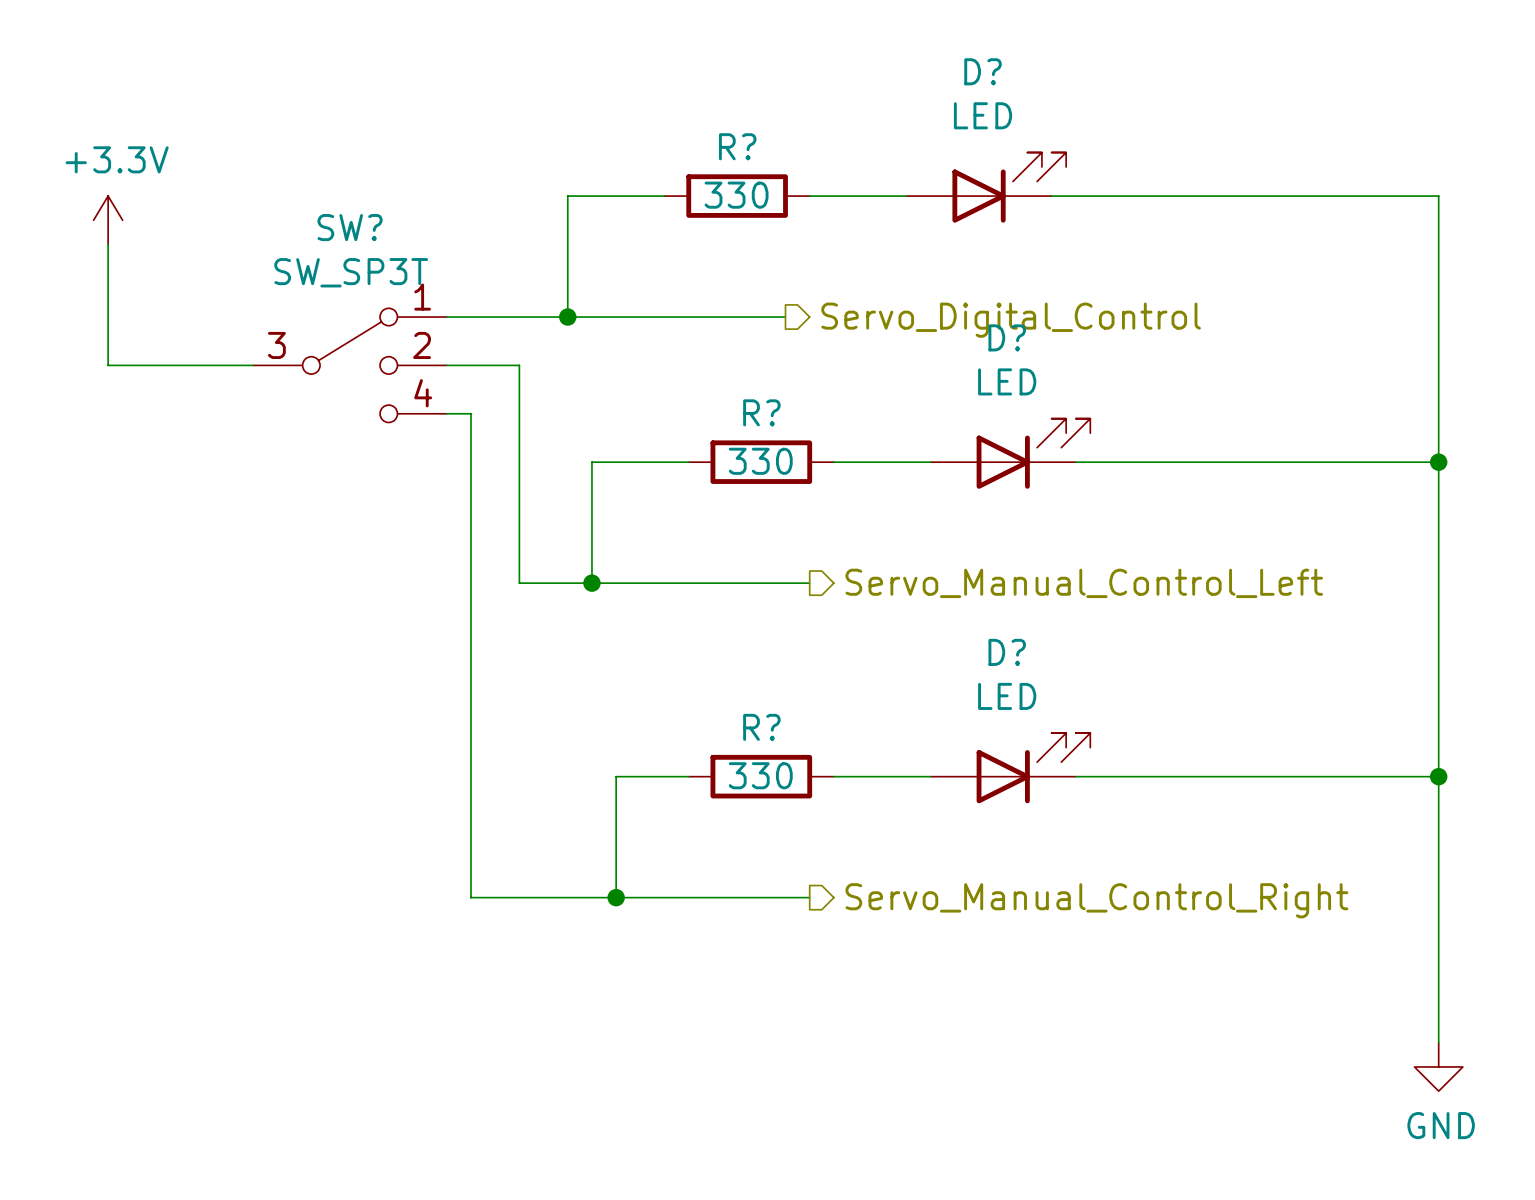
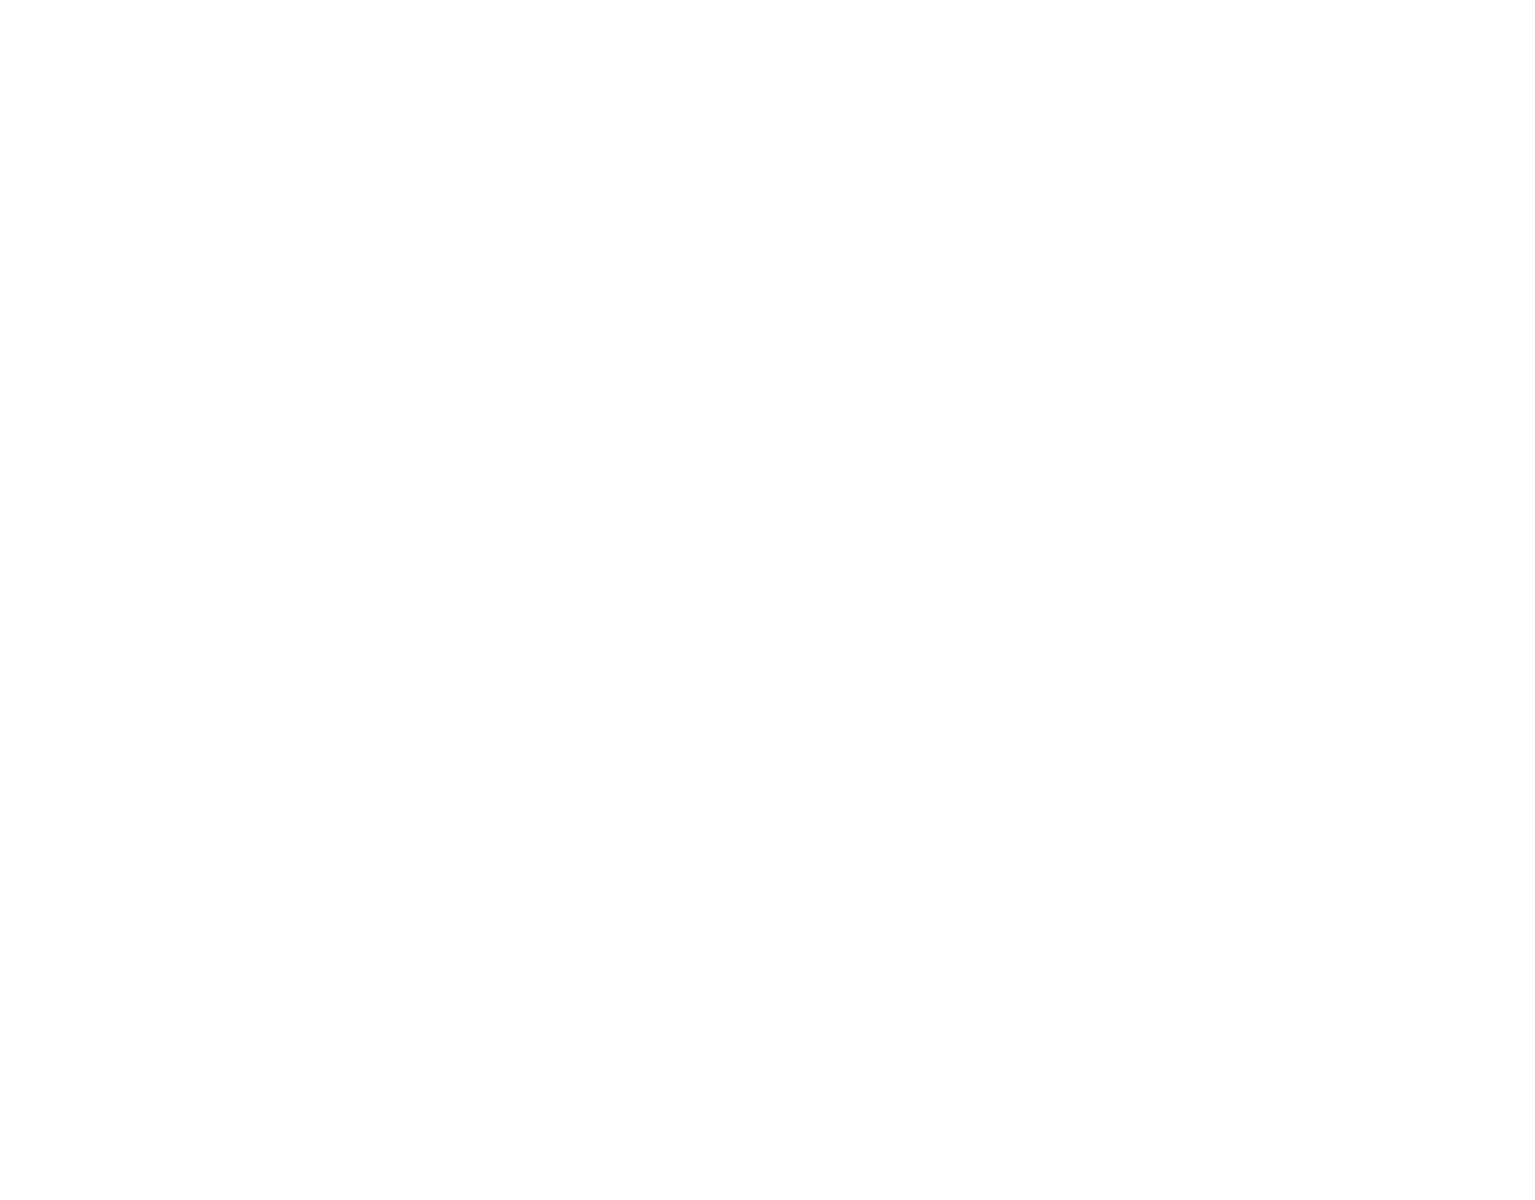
D?: LED (986, 187) -> none
wire: (664, 196) (567, 196) (567, 317) -> none
R?: 330 (737, 196) -> none
wire: (809, 196) (906, 196) -> none
wire: (1051, 196) (1438, 196) (1438, 1042) -> none
power symbol: +3.3V (108, 220) -> none
wire: (108, 244) (108, 365) (253, 365) -> none
wire: (446, 317) (785, 317) -> none
junction: (567, 317) -> none
hierarchical label: Servo_Digital_Control (1011, 320) -> none
SW?: SW_SP3T (350, 365) -> none
wire: (446, 365) (519, 365) (519, 583) (809, 583) -> none
wire: (446, 413) (471, 413) (471, 897) (809, 897) -> none
D?: LED (1010, 453) -> none
wire: (688, 462) (591, 462) (591, 583) -> none
R?: 330 (761, 462) -> none
wire: (833, 462) (930, 462) -> none
wire: (1075, 462) (1438, 462) -> none
junction: (1438, 462) -> none
junction: (591, 583) -> none
hierarchical label: Servo_Manual_Control_Left (1084, 583) -> none
D?: LED (1010, 768) -> none
wire: (688, 776) (616, 776) (616, 897) -> none
R?: 330 (761, 776) -> none
wire: (833, 776) (930, 776) -> none
wire: (1075, 776) (1438, 776) -> none
junction: (1438, 776) -> none
junction: (616, 897) -> none
hierarchical label: Servo_Manual_Control_Right (1096, 900) -> none
power symbol: GND (1438, 1066) -> none

